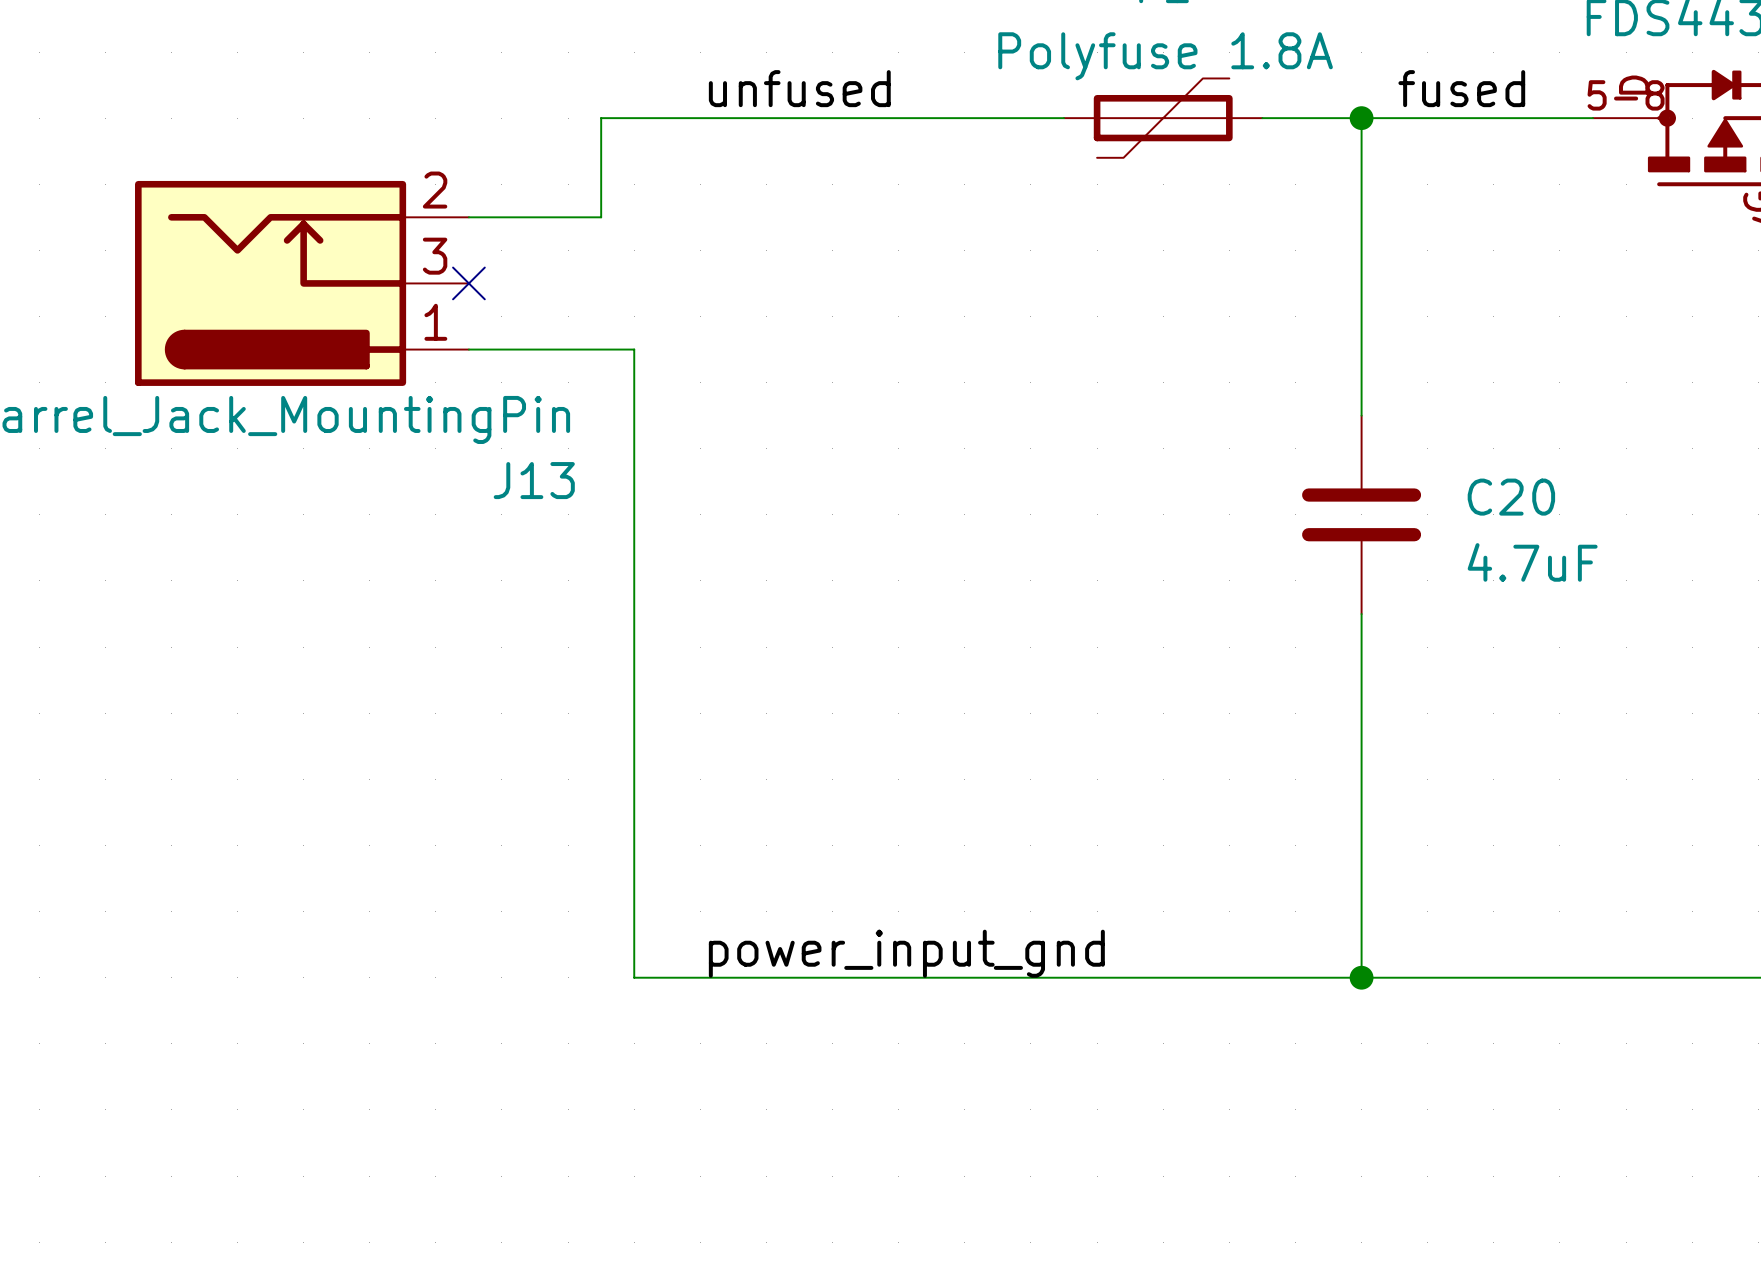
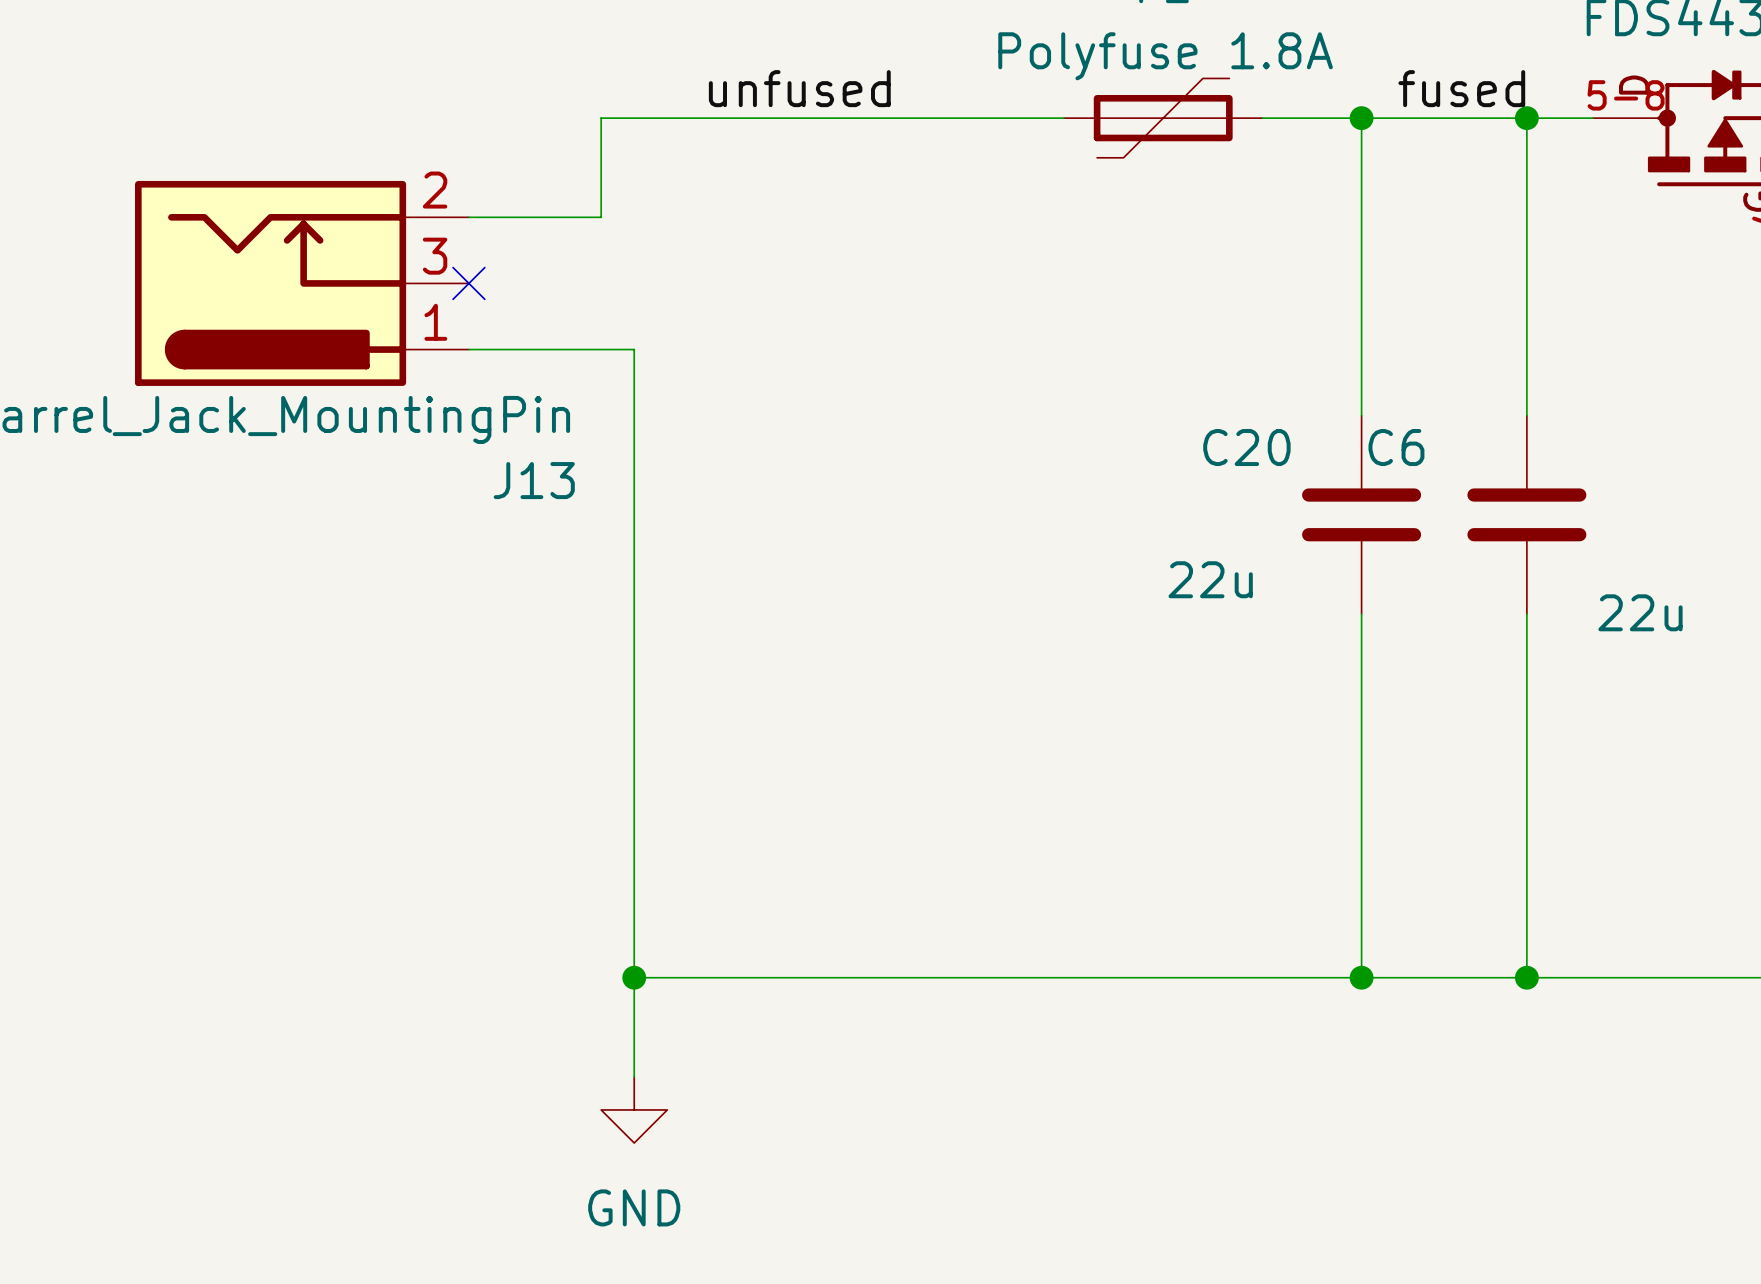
wire: none -> (1526, 118) (1526, 415)
junction: none -> (1526, 118)
C20 name position: C20 (1511, 497) -> C20 (1246, 447)
C6: none -> 22u (1526, 514)
C20 value: 4.7uF (1532, 562) -> 22u (1210, 579)
wire: none -> (1526, 614) (1526, 977)
label: power_input_gnd (906, 953) -> none
wire: none -> (634, 977) (634, 1076)
junction: none -> (634, 977)
junction: none -> (1526, 977)
power symbol: none -> GND (634, 1109)

